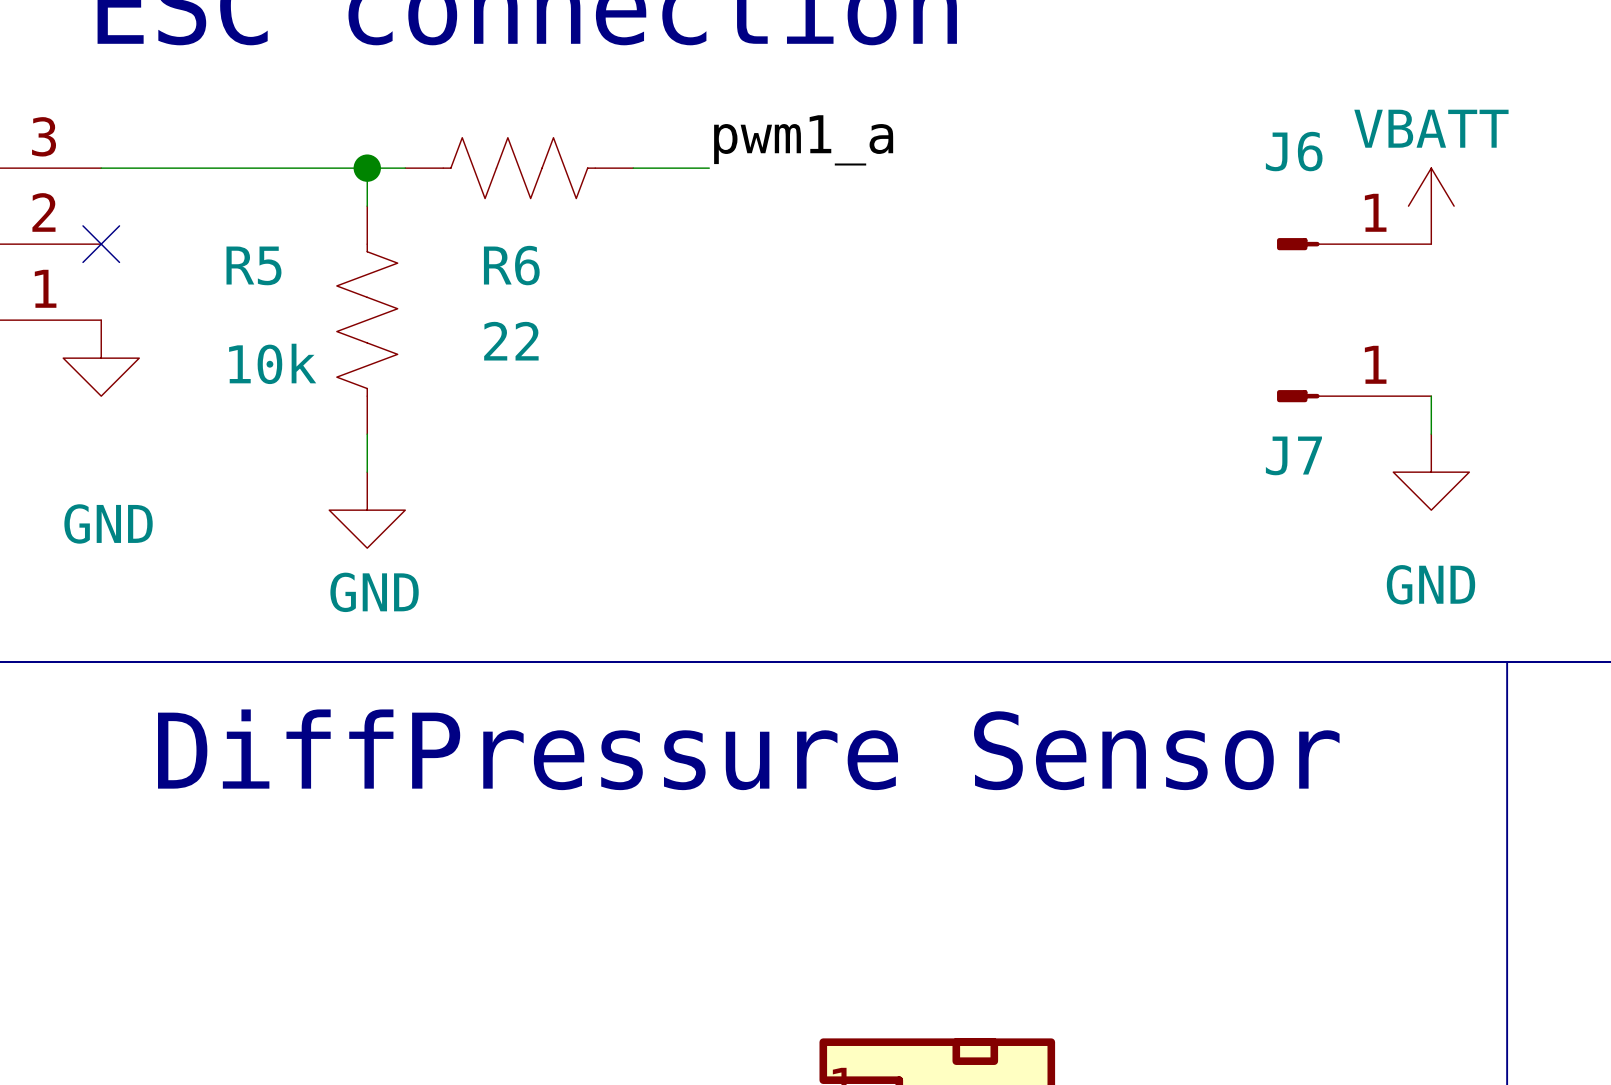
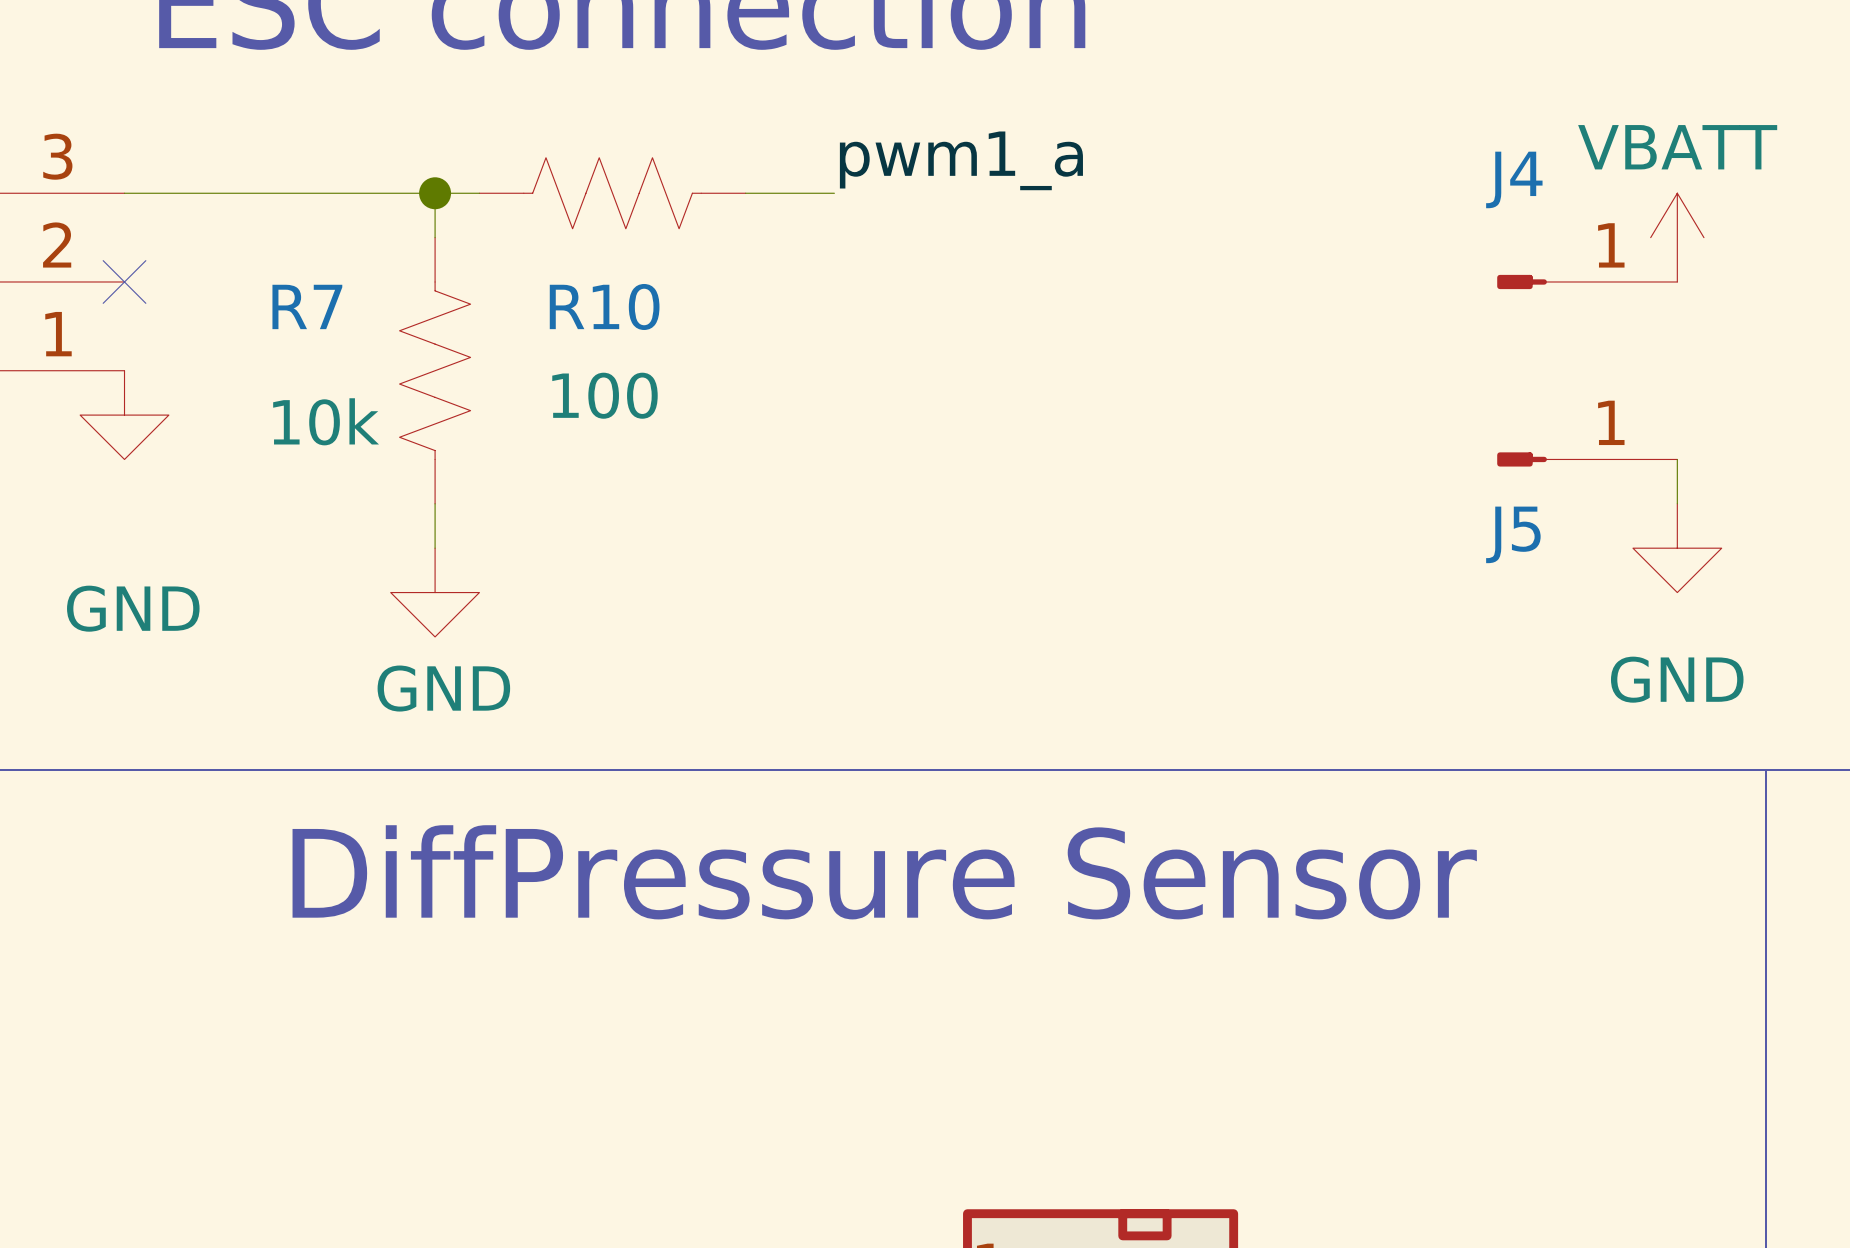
J6 name: J6 (1294, 151) -> J4 (1514, 179)
R5 name: R5 (253, 265) -> R7 (307, 306)
R6 name: R6 (511, 265) -> R10 (604, 306)
R6 value: 22 (511, 341) -> 100 (604, 395)
J7 name: J7 (1293, 455) -> J5 (1513, 534)

